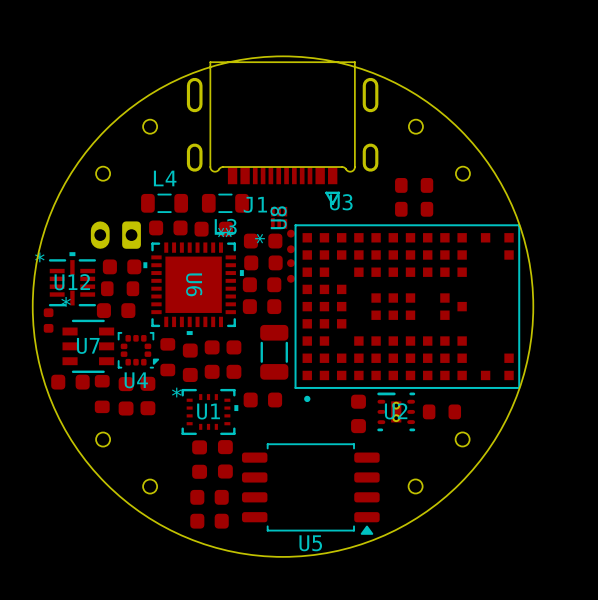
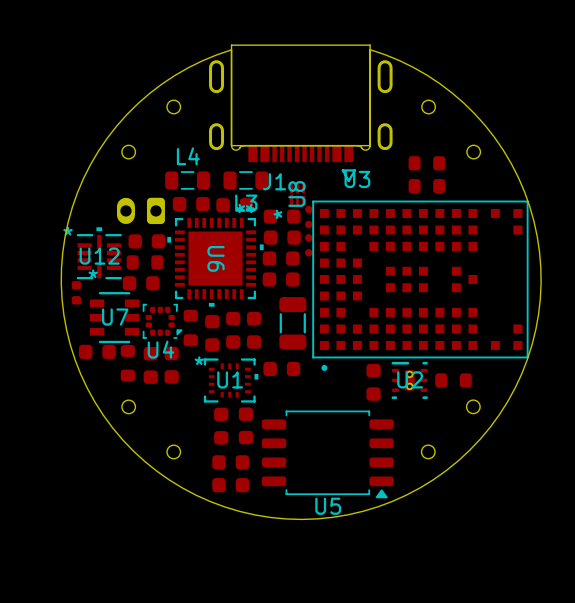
round board edge: [32, 55, 534, 558] -> none
board edge: none -> (370, 145) (370, 49) (413, 67) (452, 92) (485, 125) (503, 150) (518, 177) (529, 206) (537, 236) (540, 267) (540, 298) (535, 329) (527, 359) (515, 387) (490, 427) (458, 460) (420, 487) (377, 506) (332, 517) (286, 518) (240, 511) (196, 495) (156, 471) (122, 439) (94, 402) (75, 360) (63, 314) (61, 268) (68, 222) (83, 178) (98, 151) (116, 126) (149, 93) (188, 67) (231, 49) (231, 145) (370, 145)

